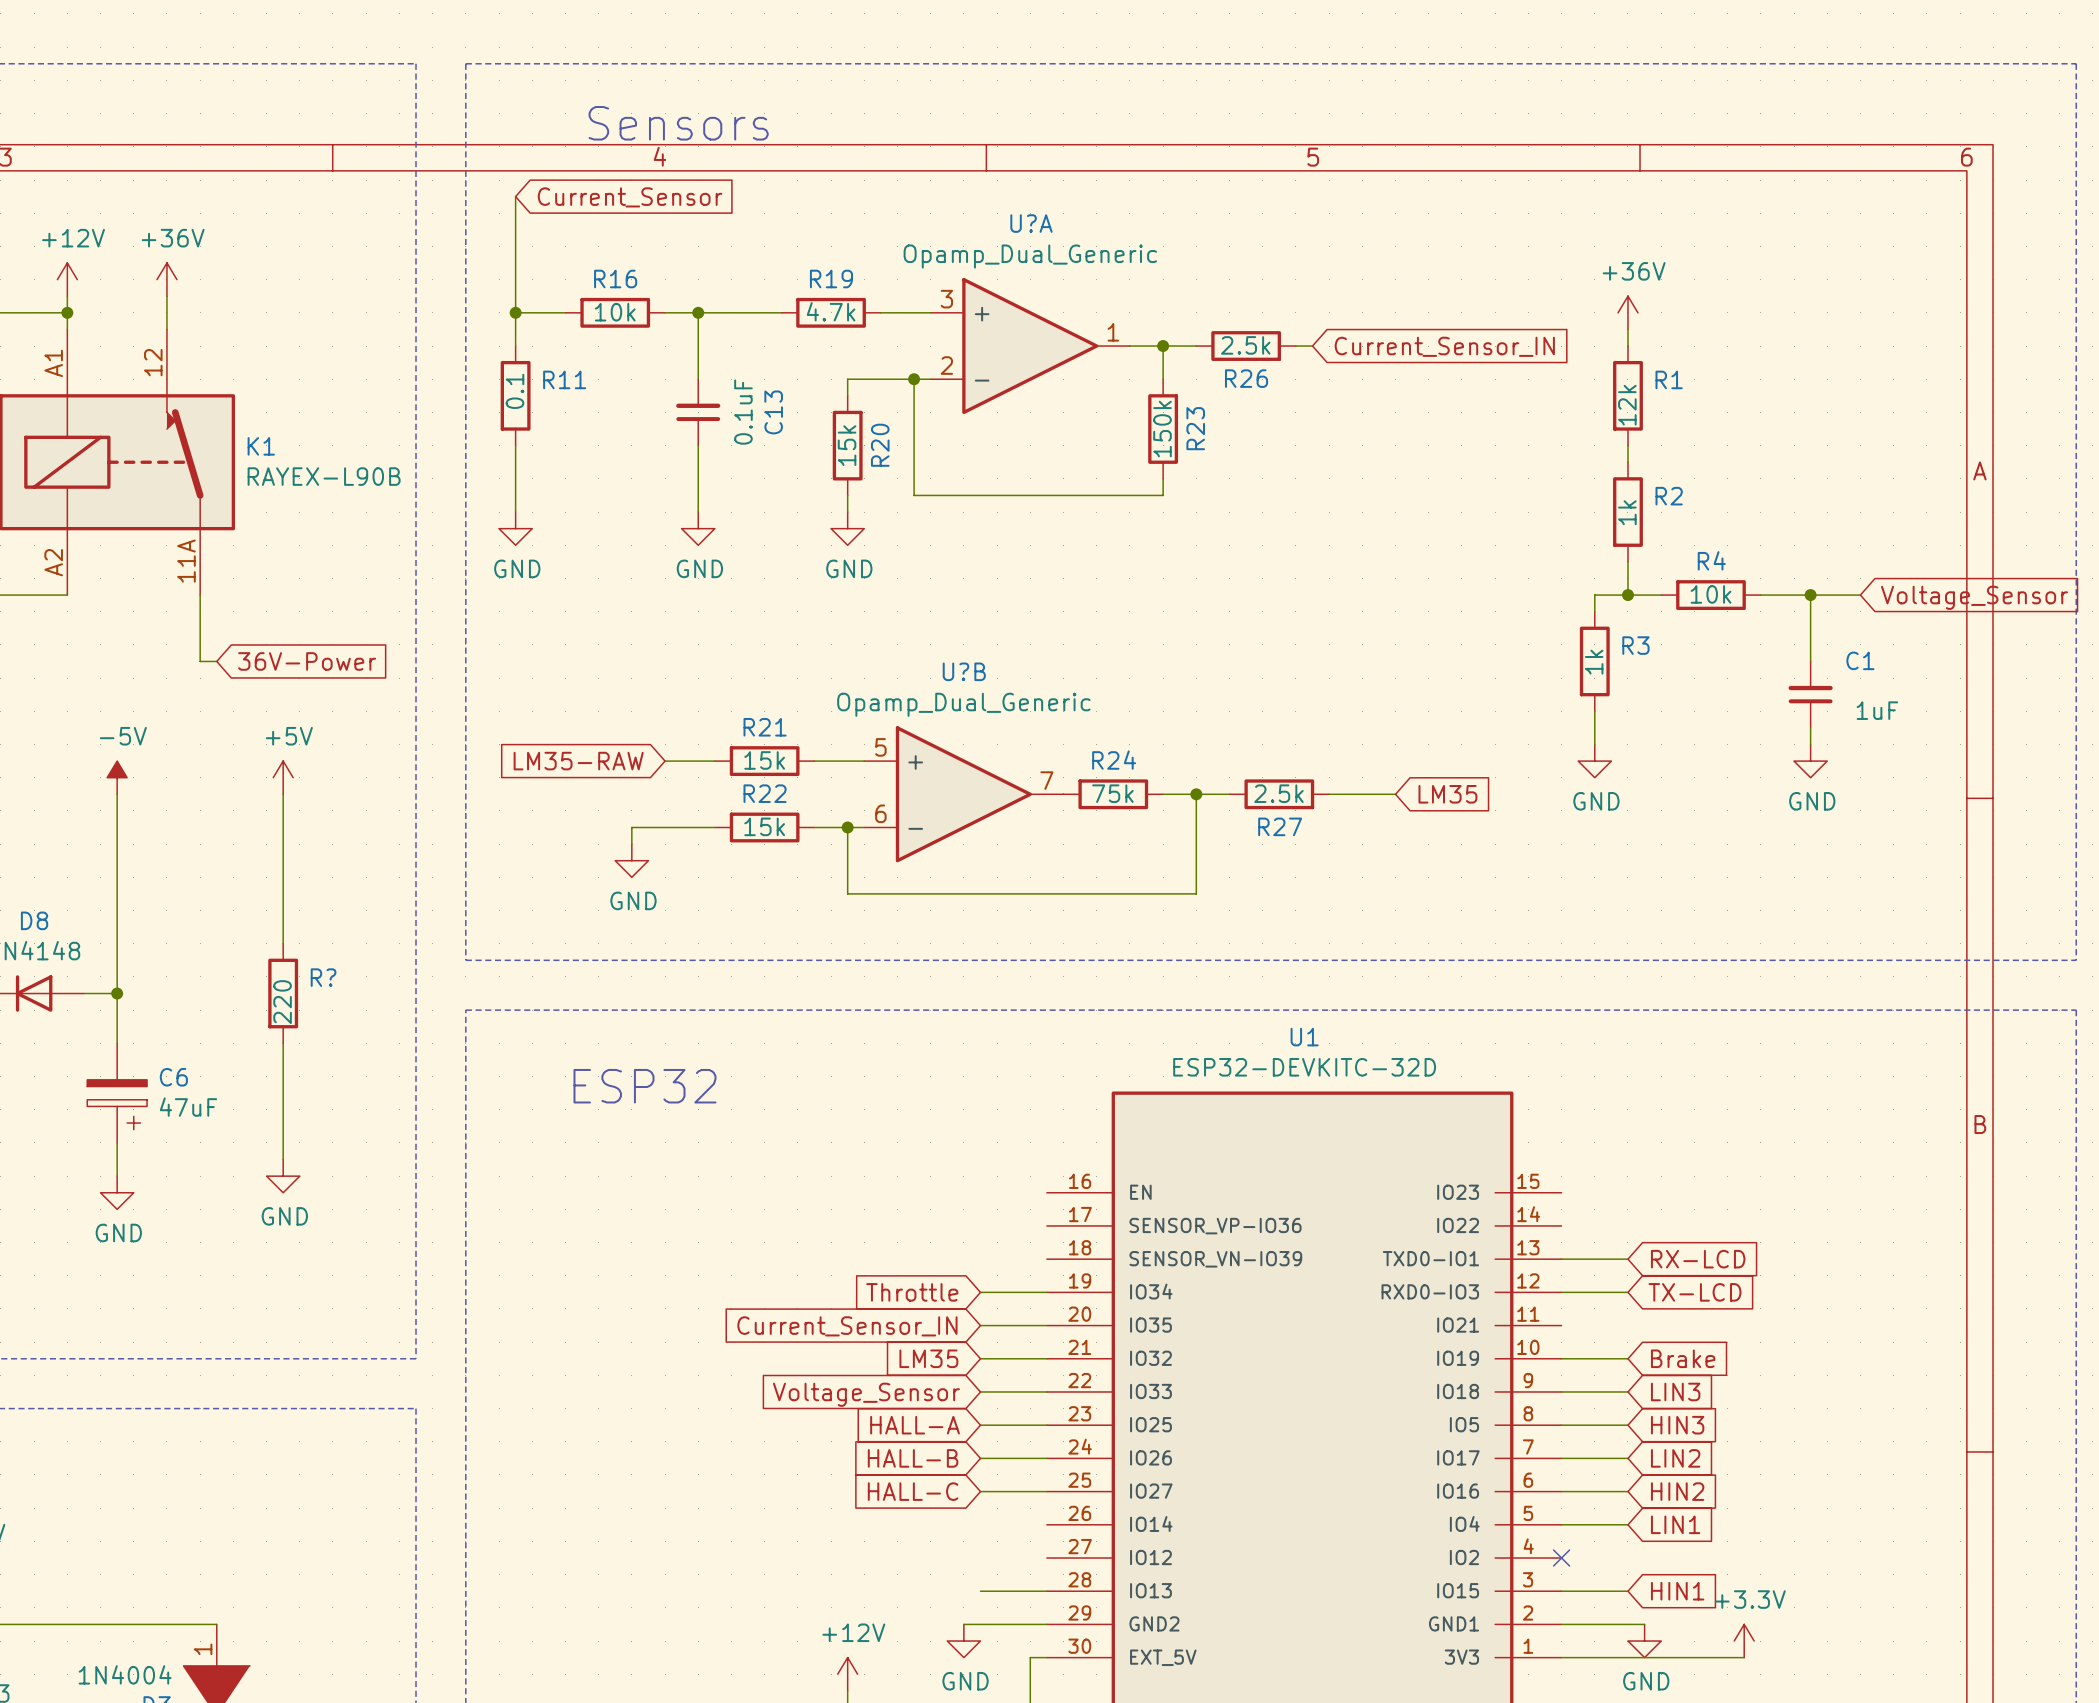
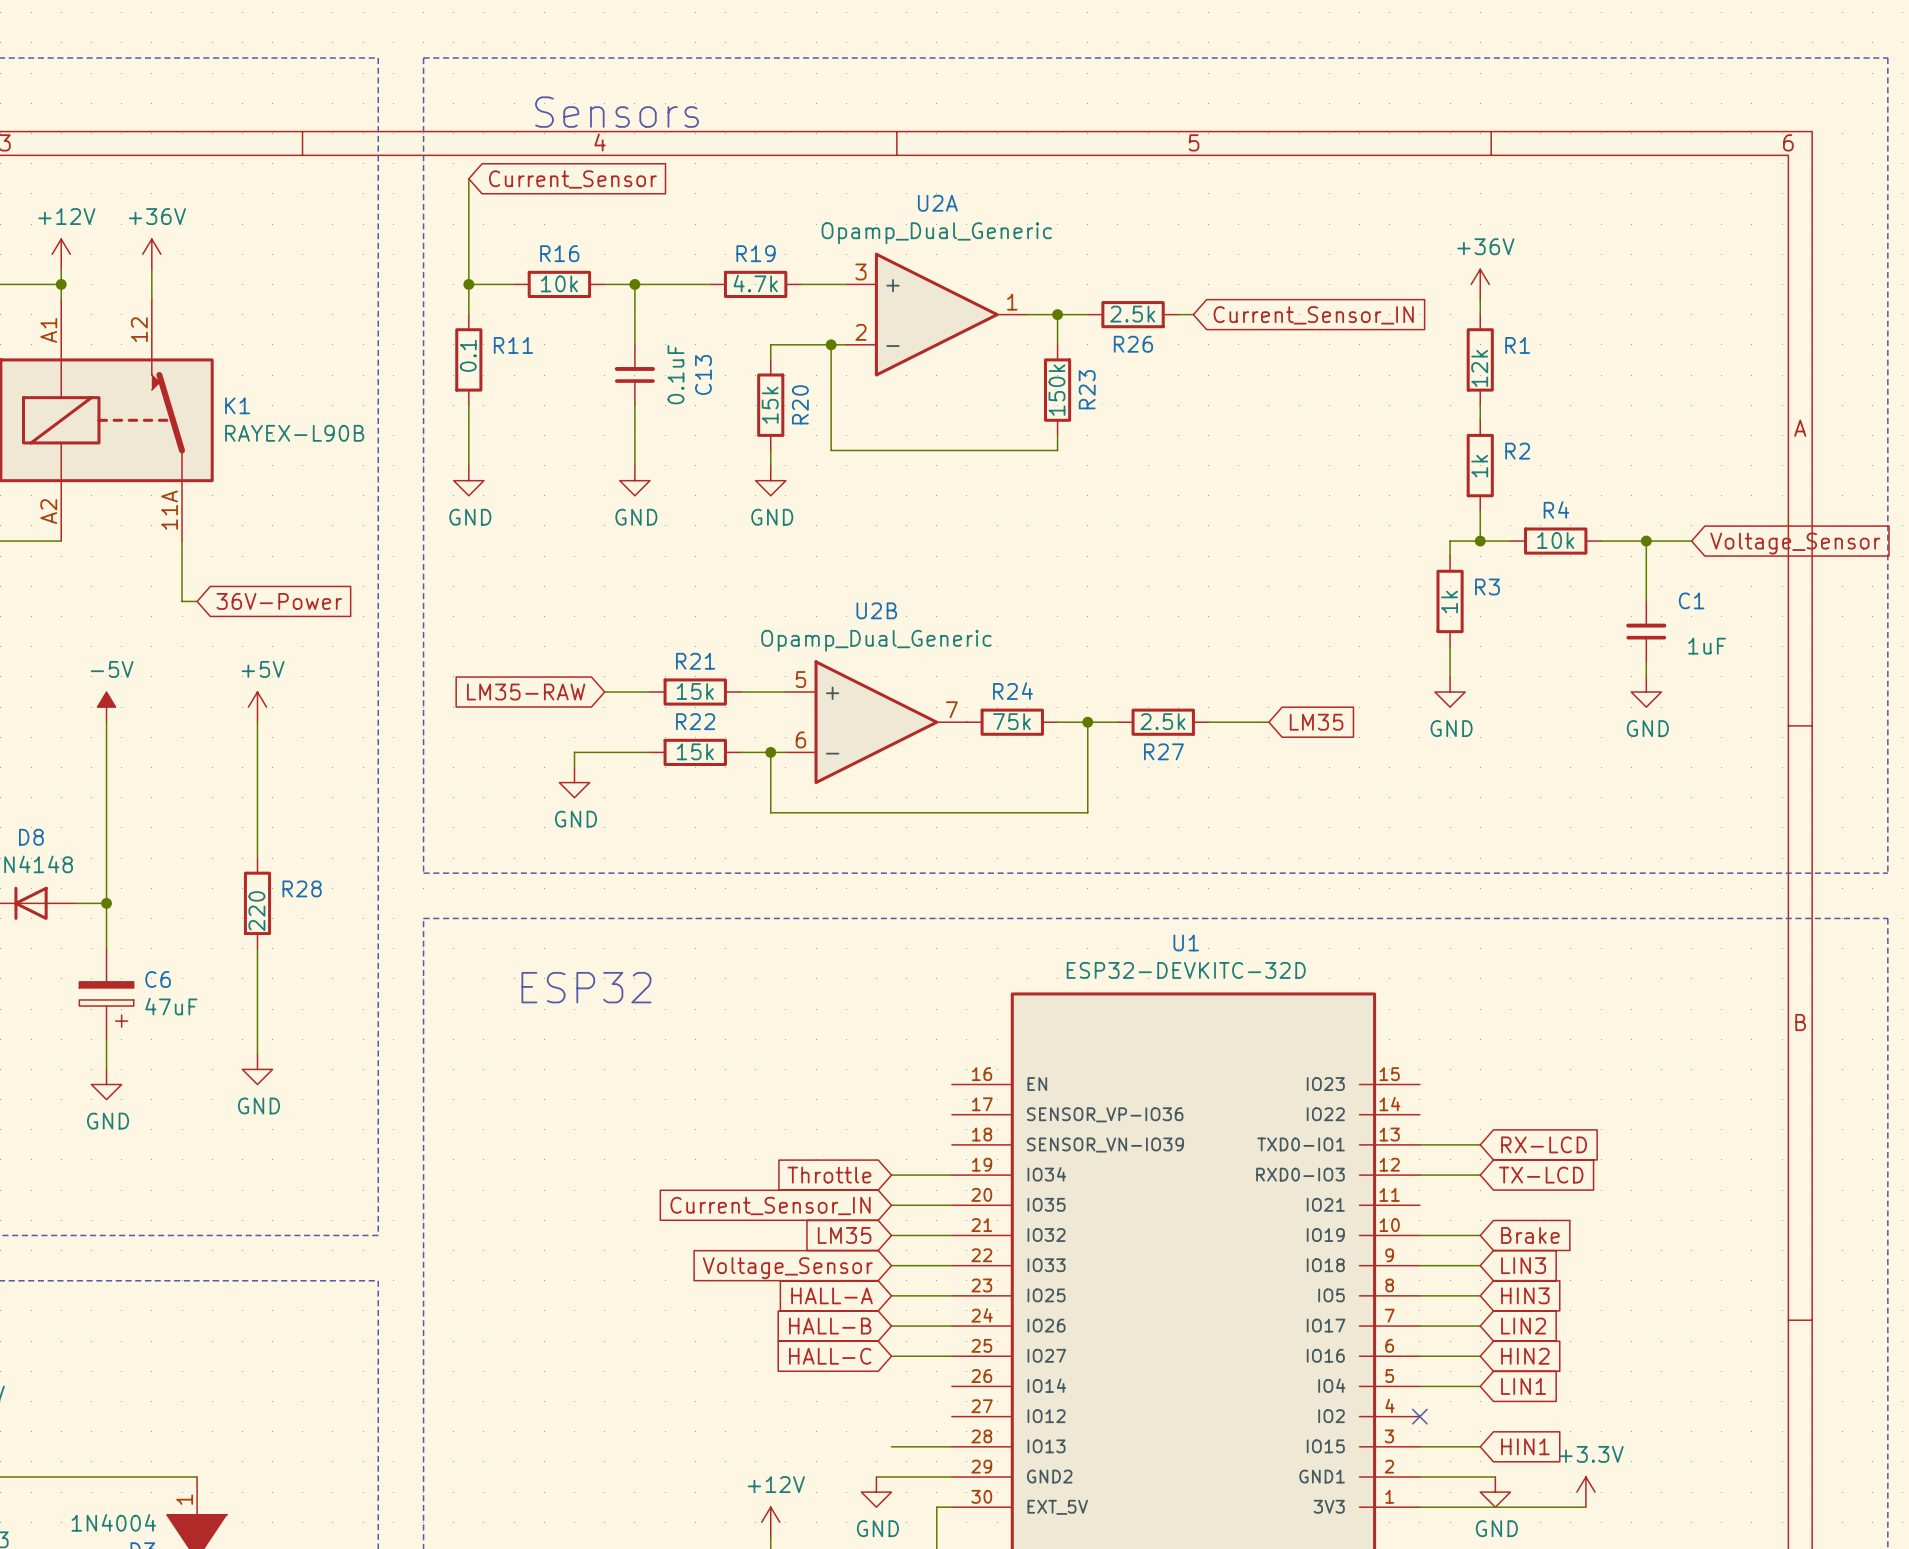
U?A name: U?A (1031, 223) -> U2A (937, 203)
U?B name: U?B (964, 671) -> U2B (876, 610)
R? name: R? (323, 977) -> R28 (302, 888)

